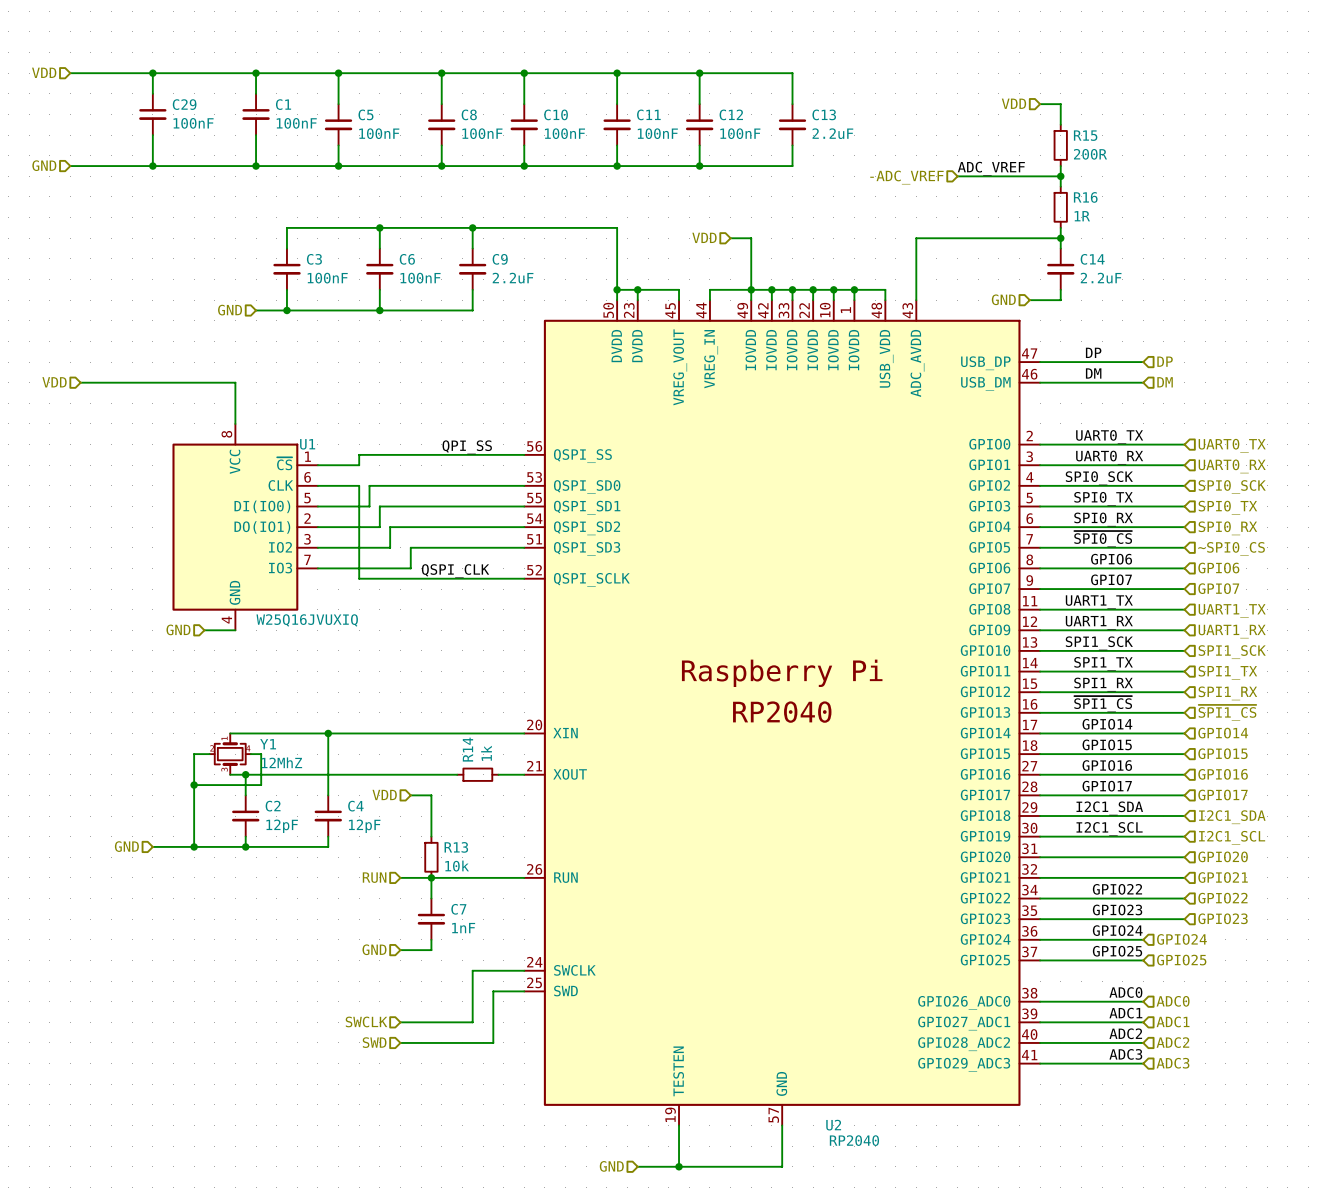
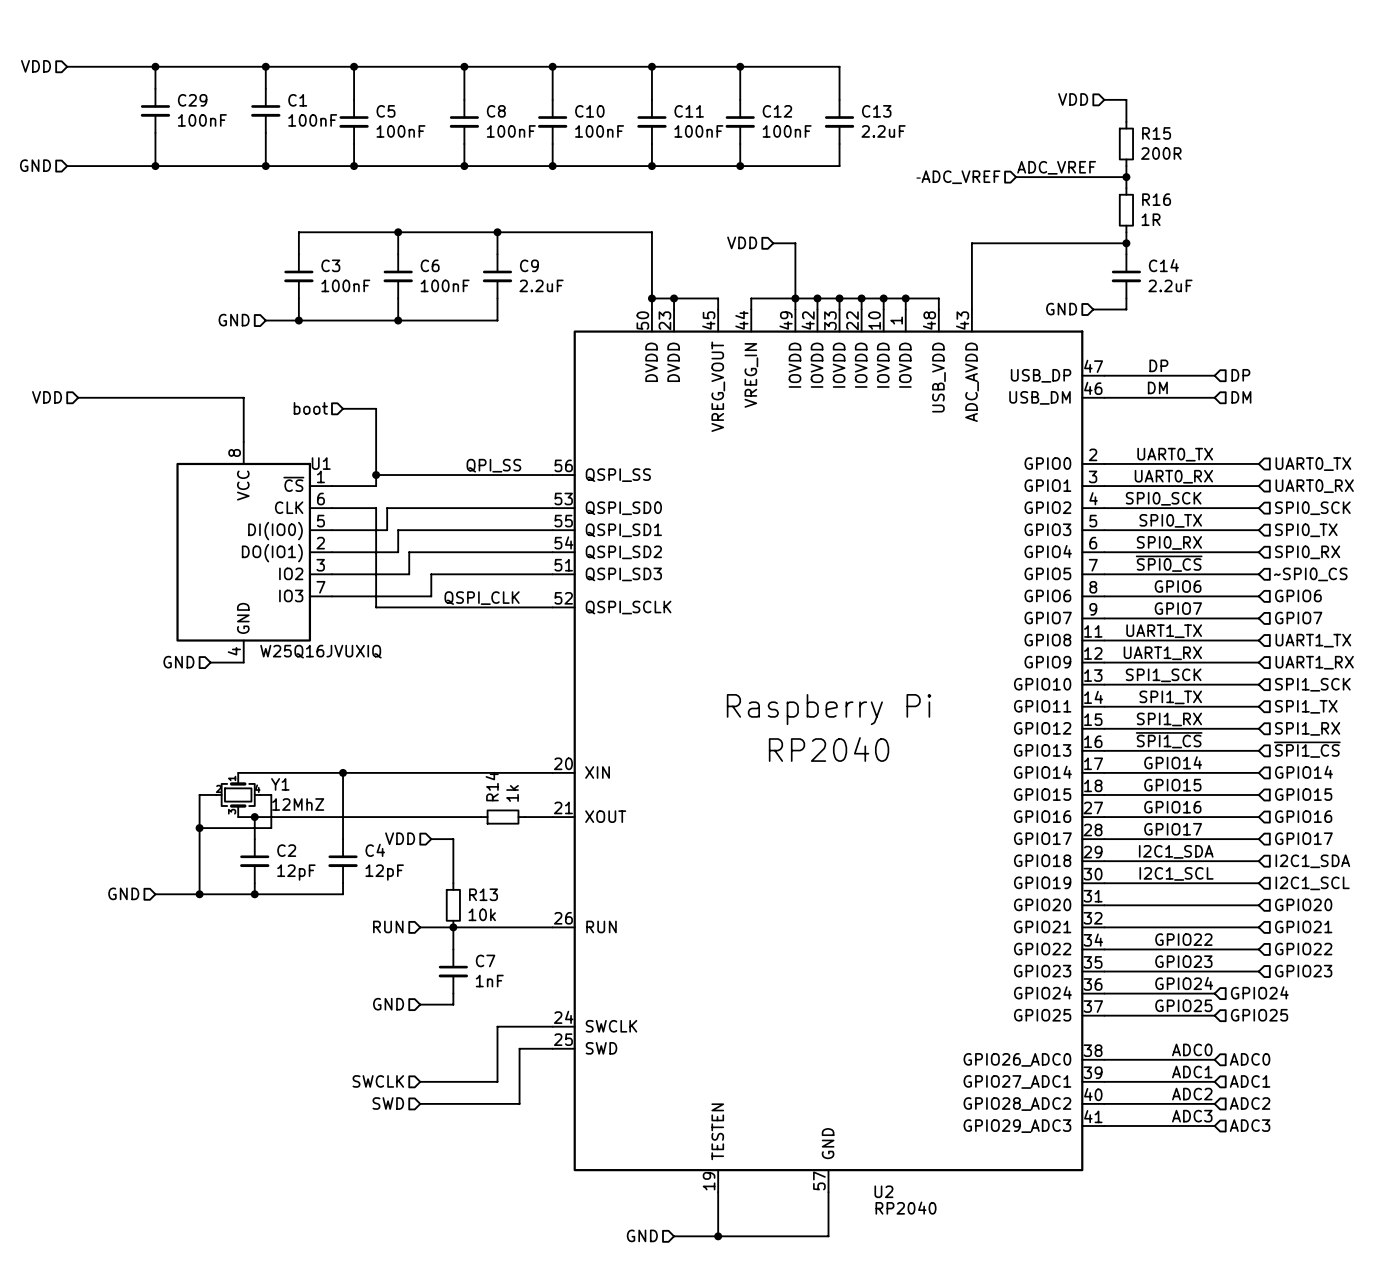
hierarchical label: none -> boot (310, 408)
wire: none -> (343, 408) (376, 408) (376, 475)
junction: none -> (376, 475)

